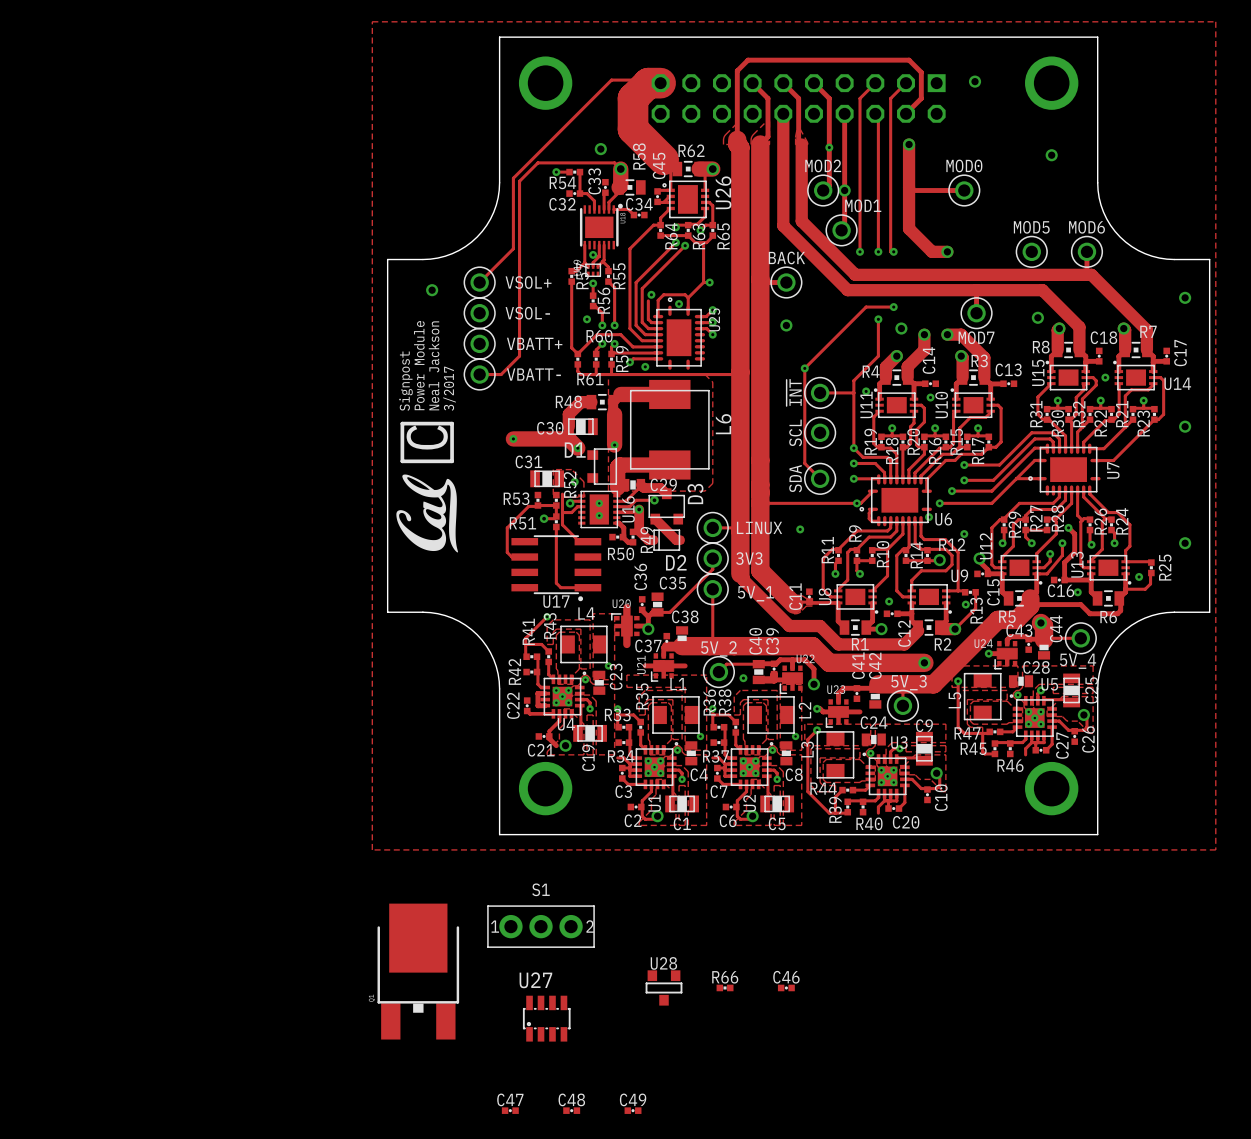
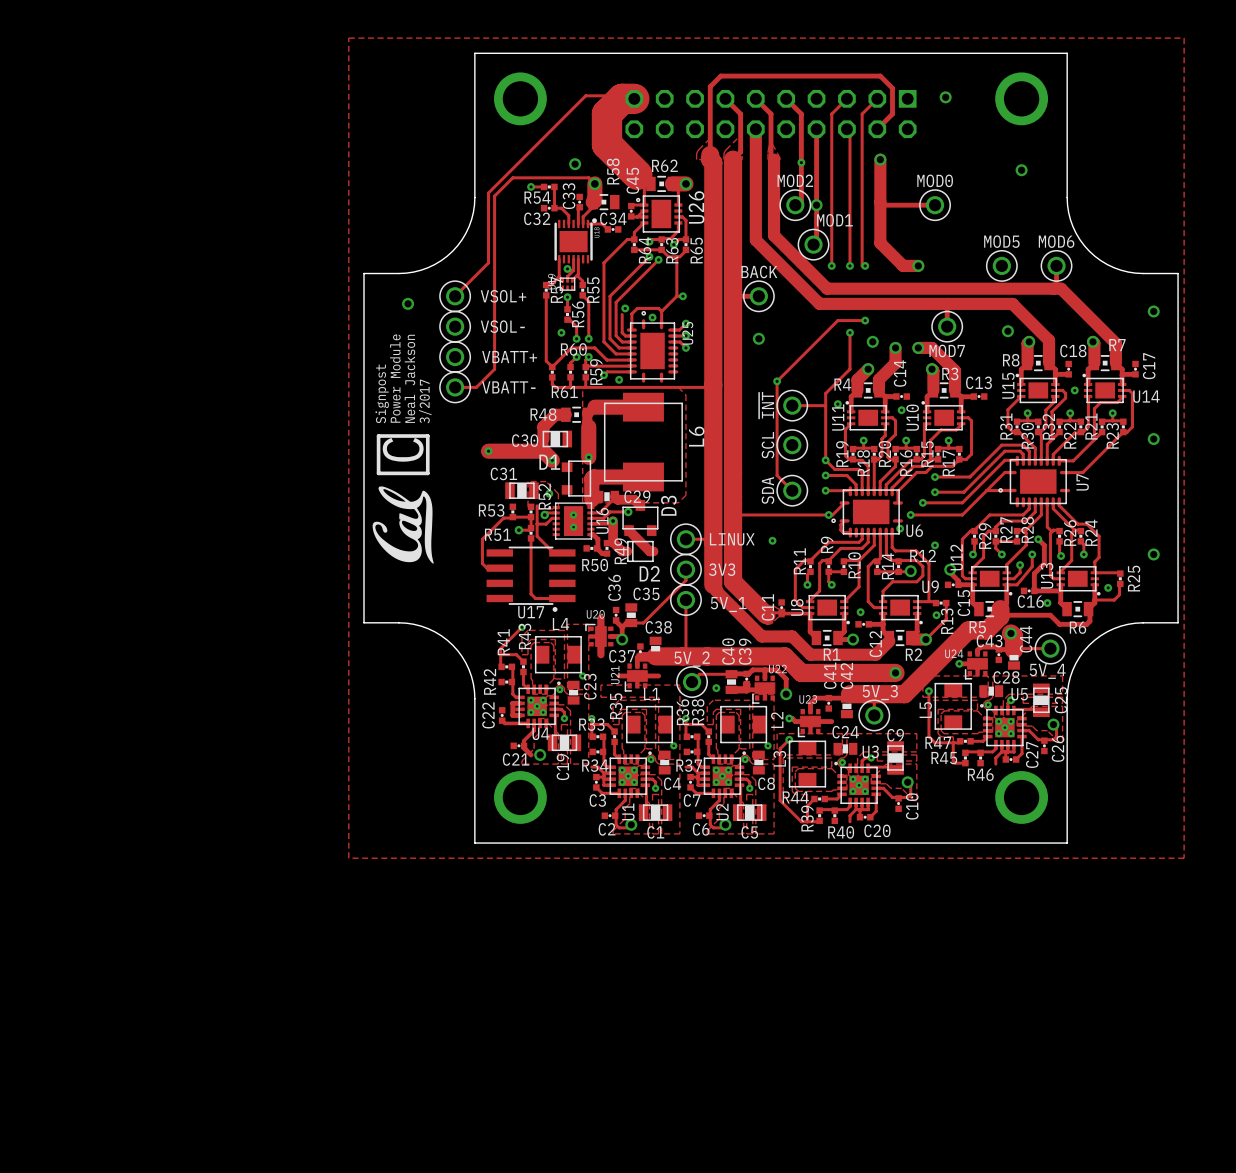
S1: (541, 926) -> none
part: (418, 971) -> none
U28: (664, 987) -> none
R66: (725, 987) -> none
C46: (786, 987) -> none
U27: (546, 1018) -> none
C47: (510, 1110) -> none
C48: (571, 1110) -> none
C49: (633, 1110) -> none

